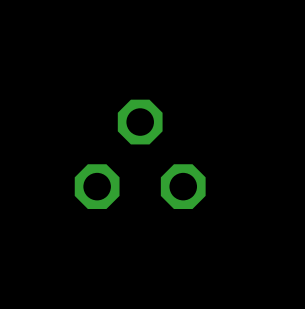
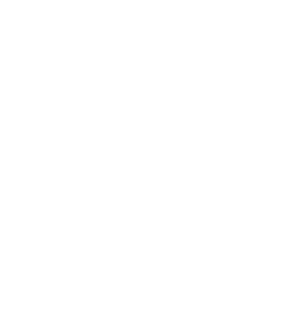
part: (140, 154) -> none

